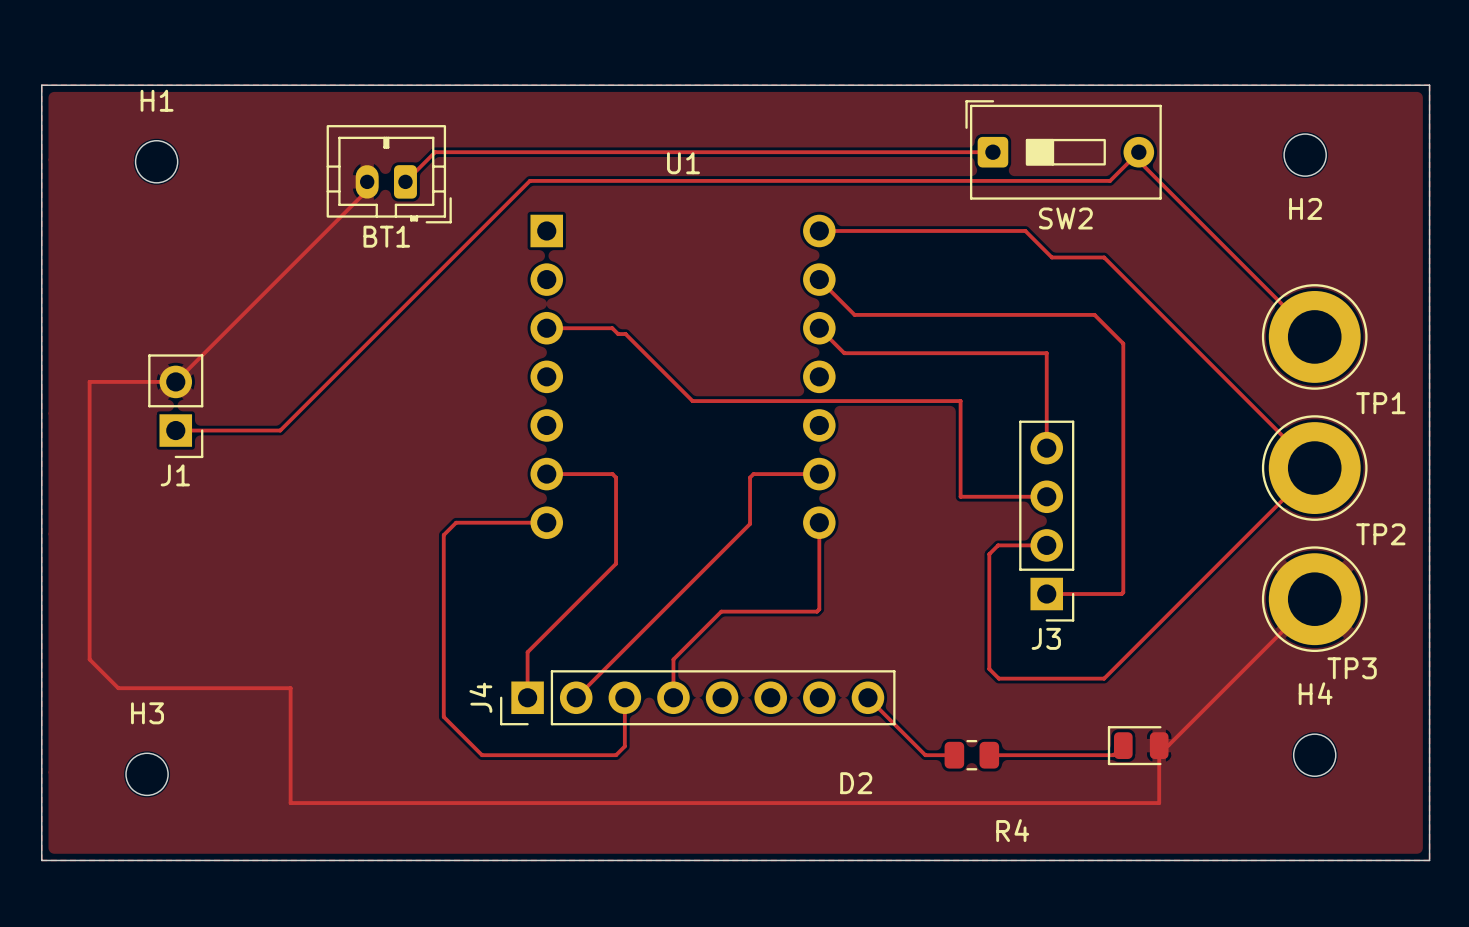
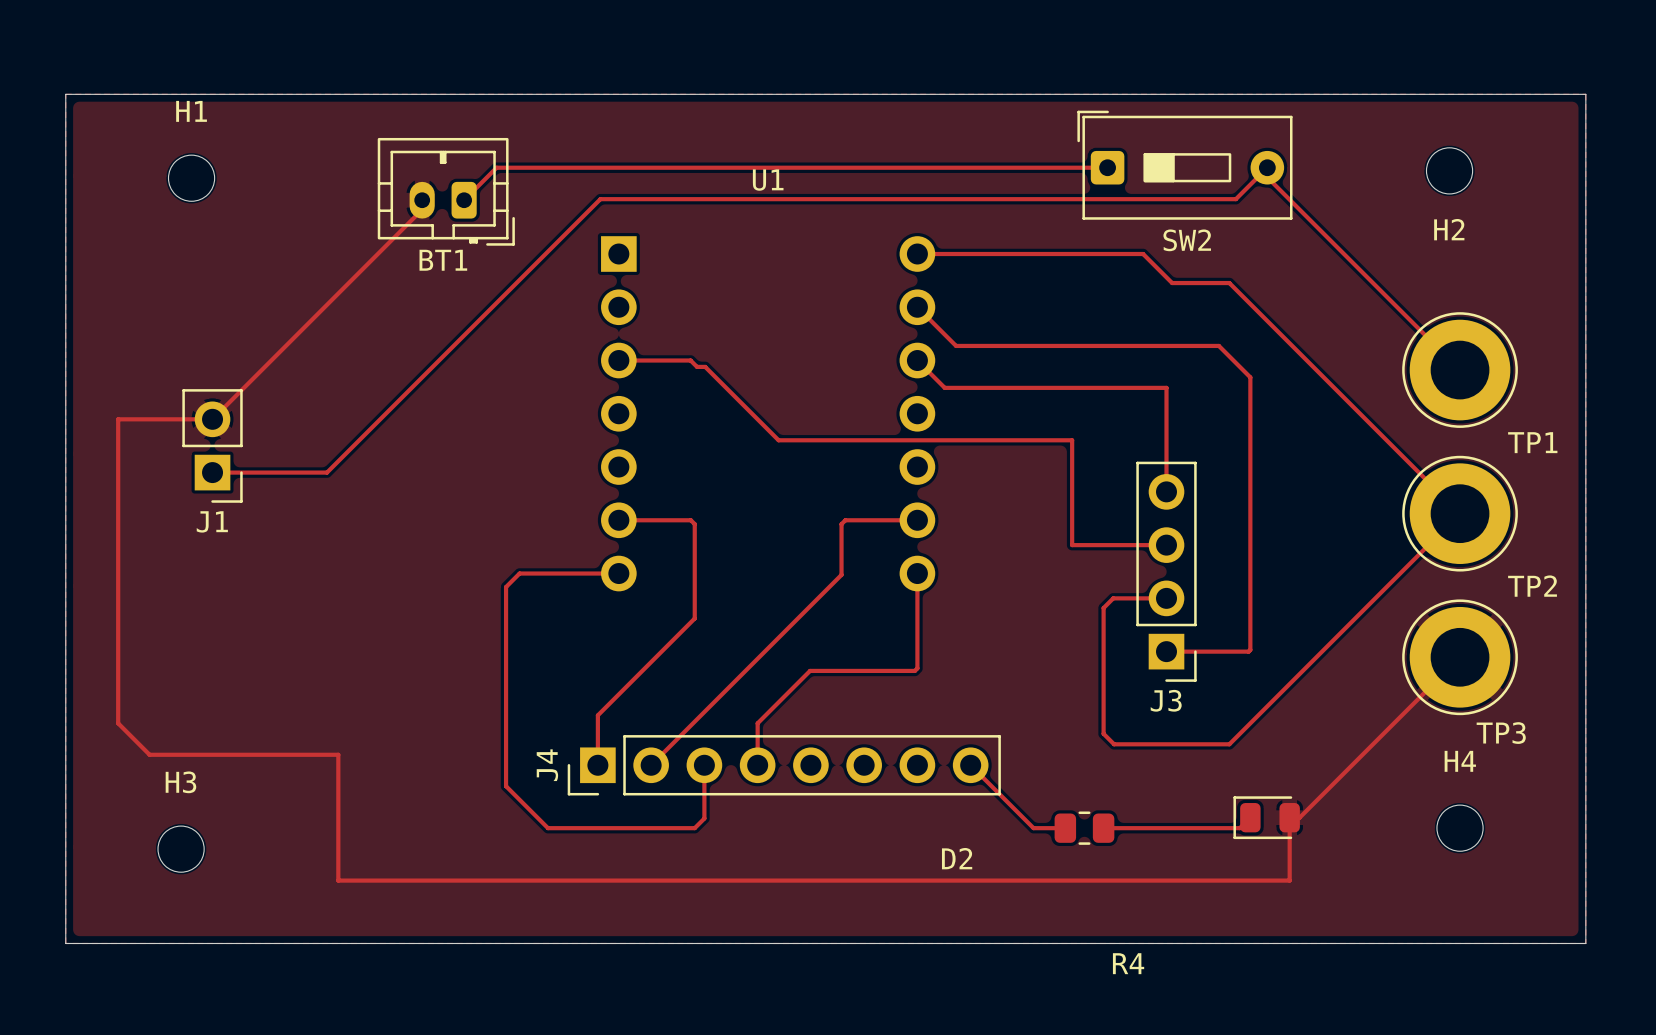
R4 name position: R4 (1012, 830) -> R4 (1128, 963)

